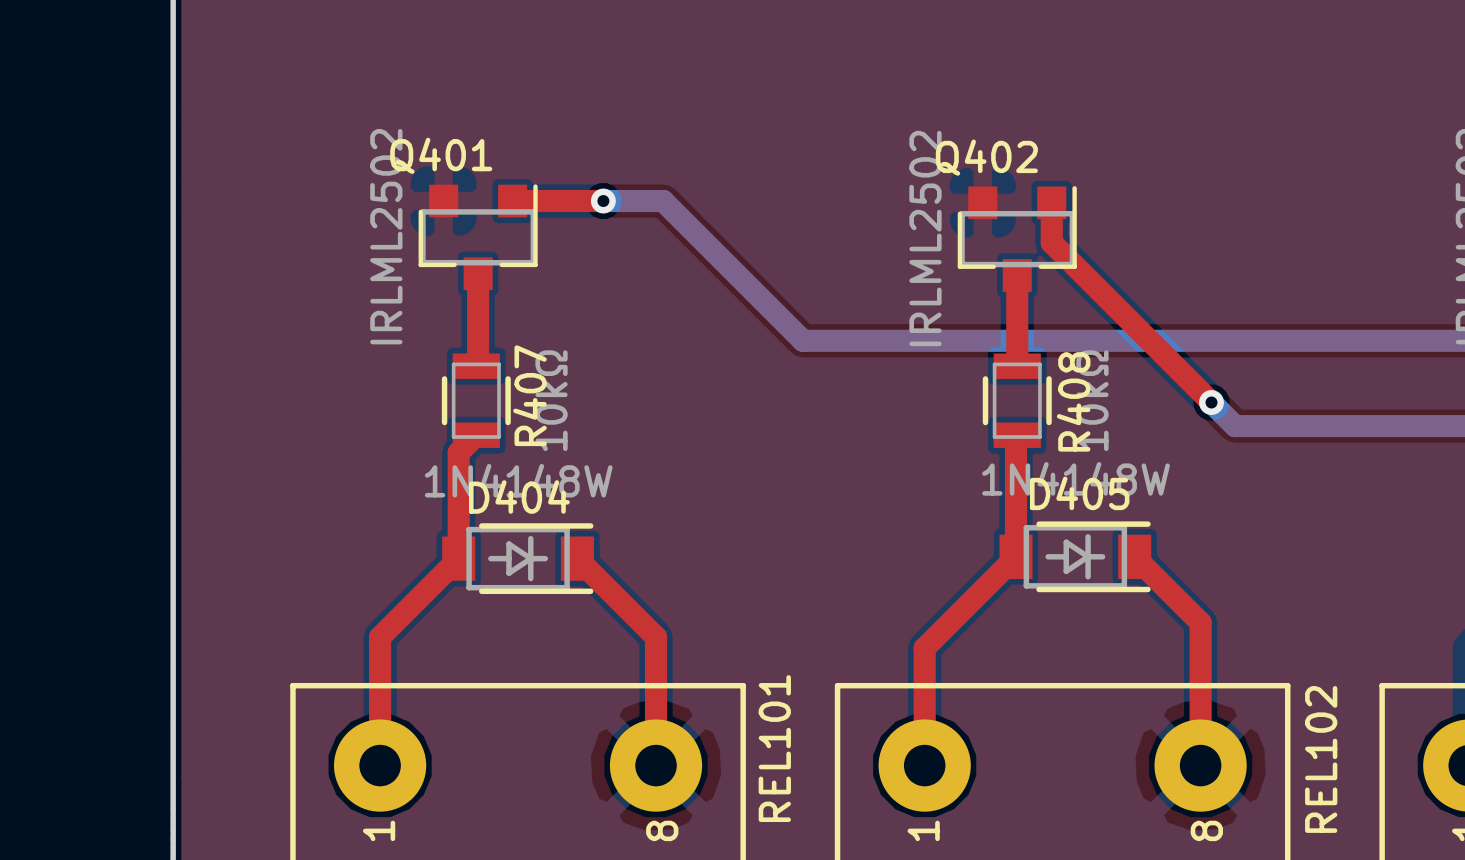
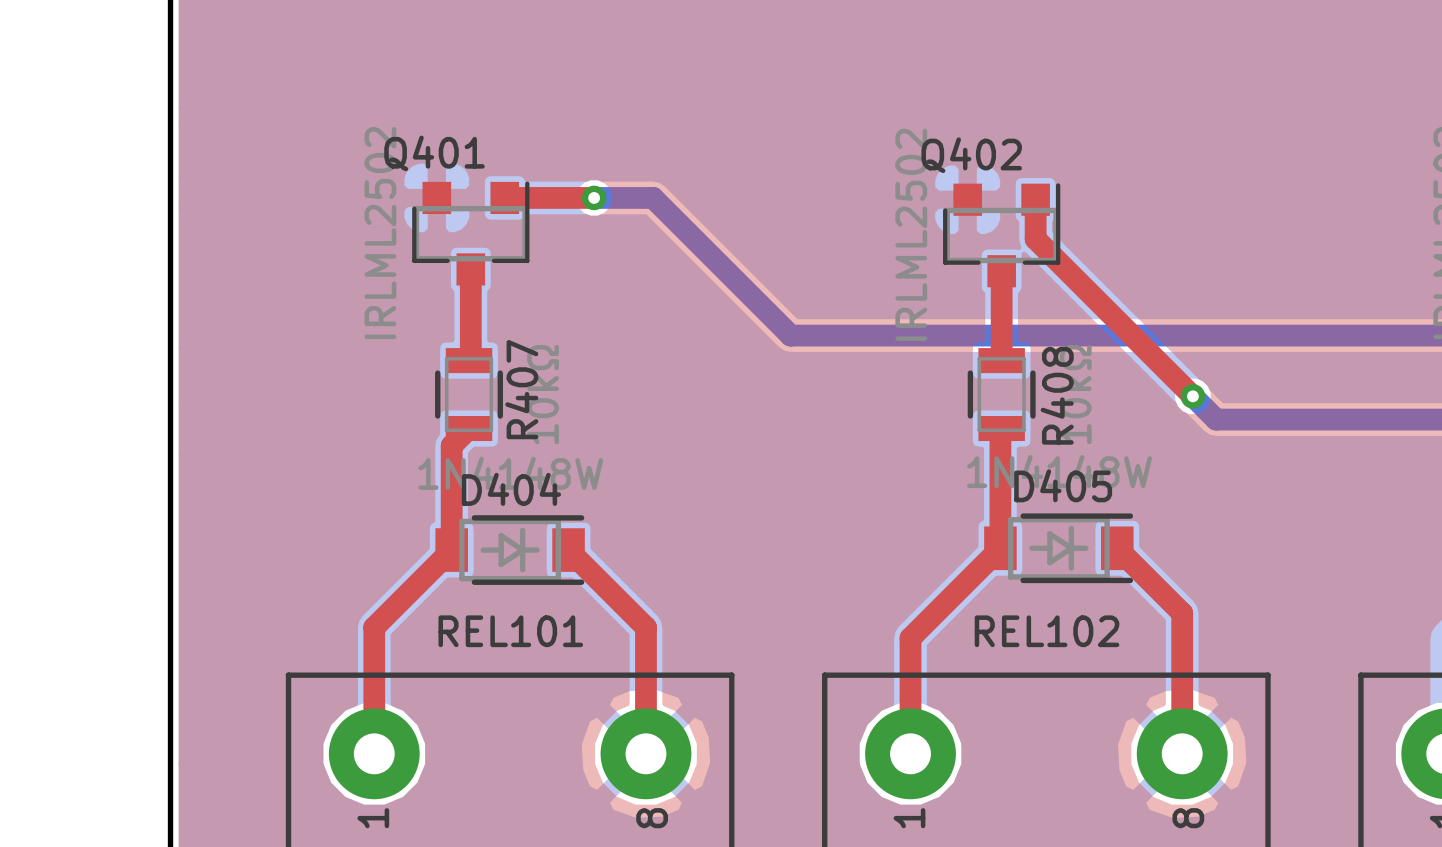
REL101 name rotation: 0° (774, 748) -> 90° clockwise (510, 631)
REL101 name position: REL101 (774, 748) -> REL101 (510, 631)
REL102 name rotation: 0° (1321, 759) -> 90° clockwise (1047, 631)
REL102 name position: REL102 (1321, 759) -> REL102 (1047, 631)

